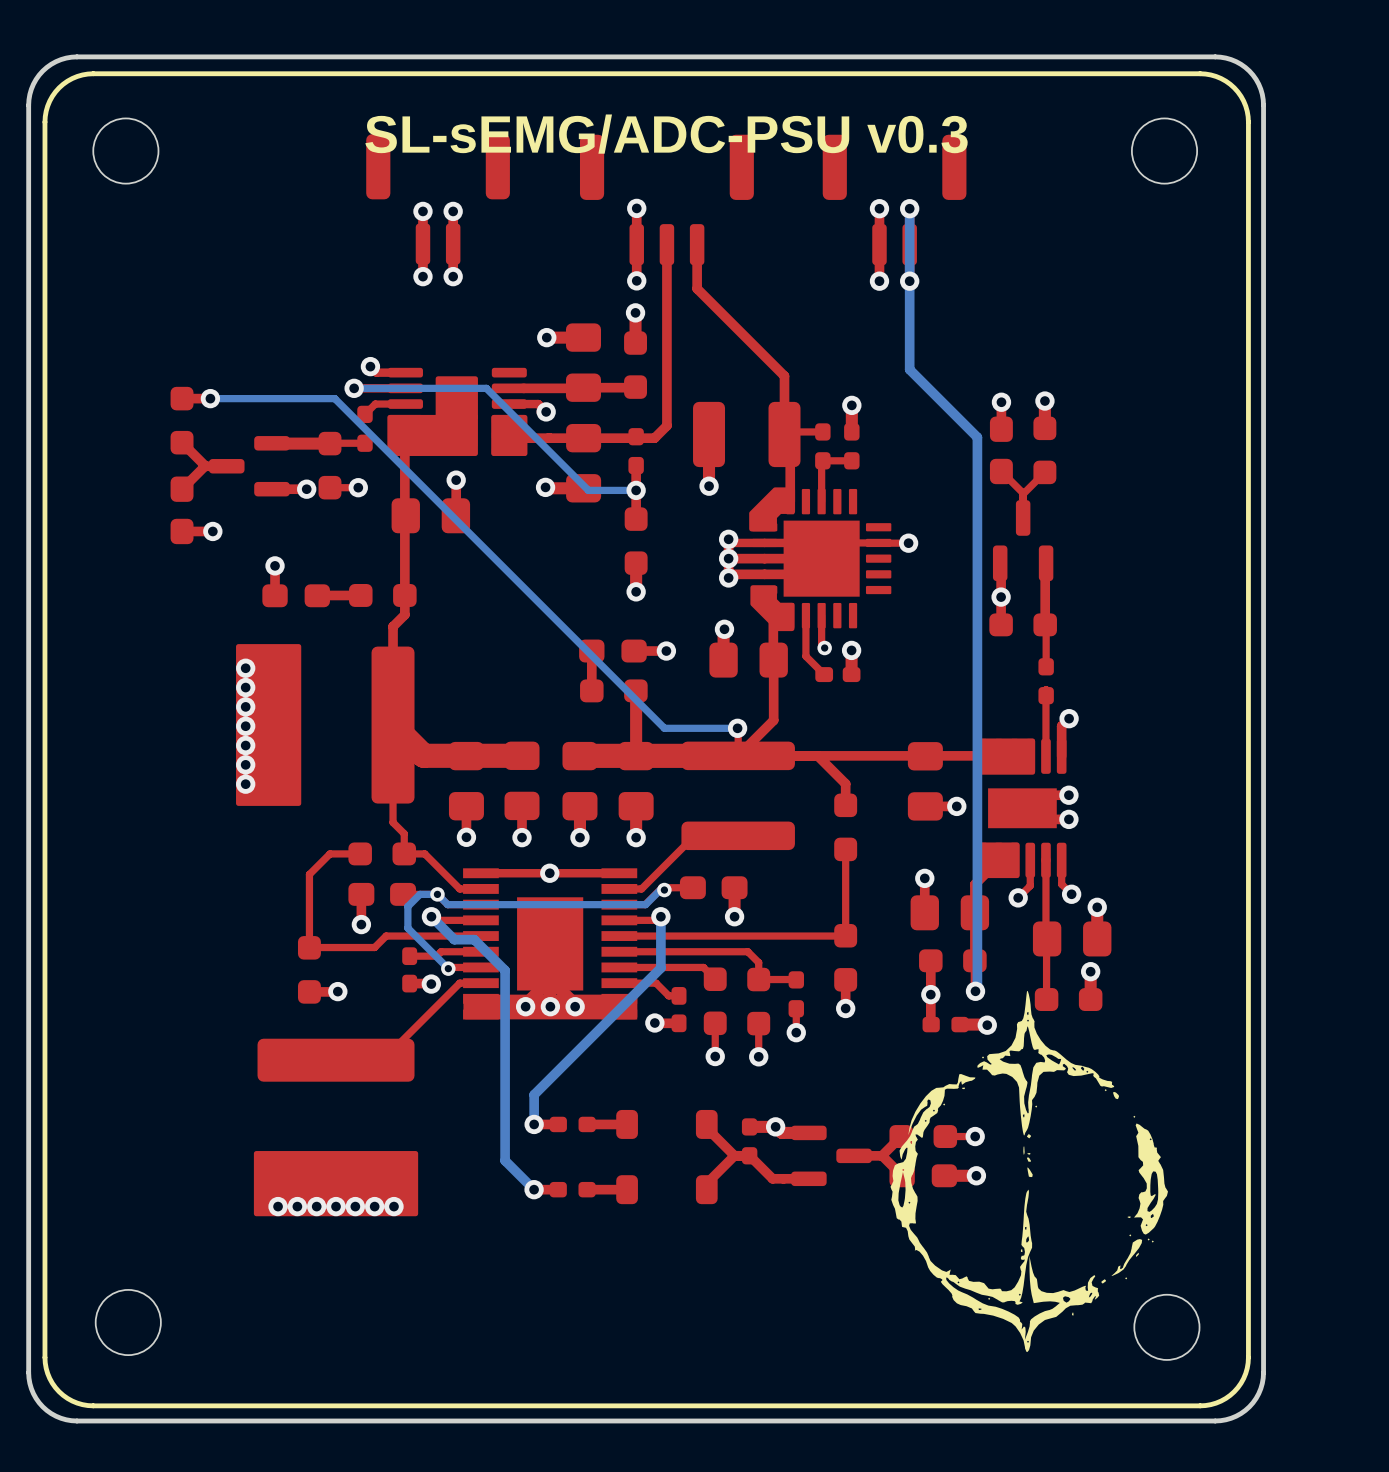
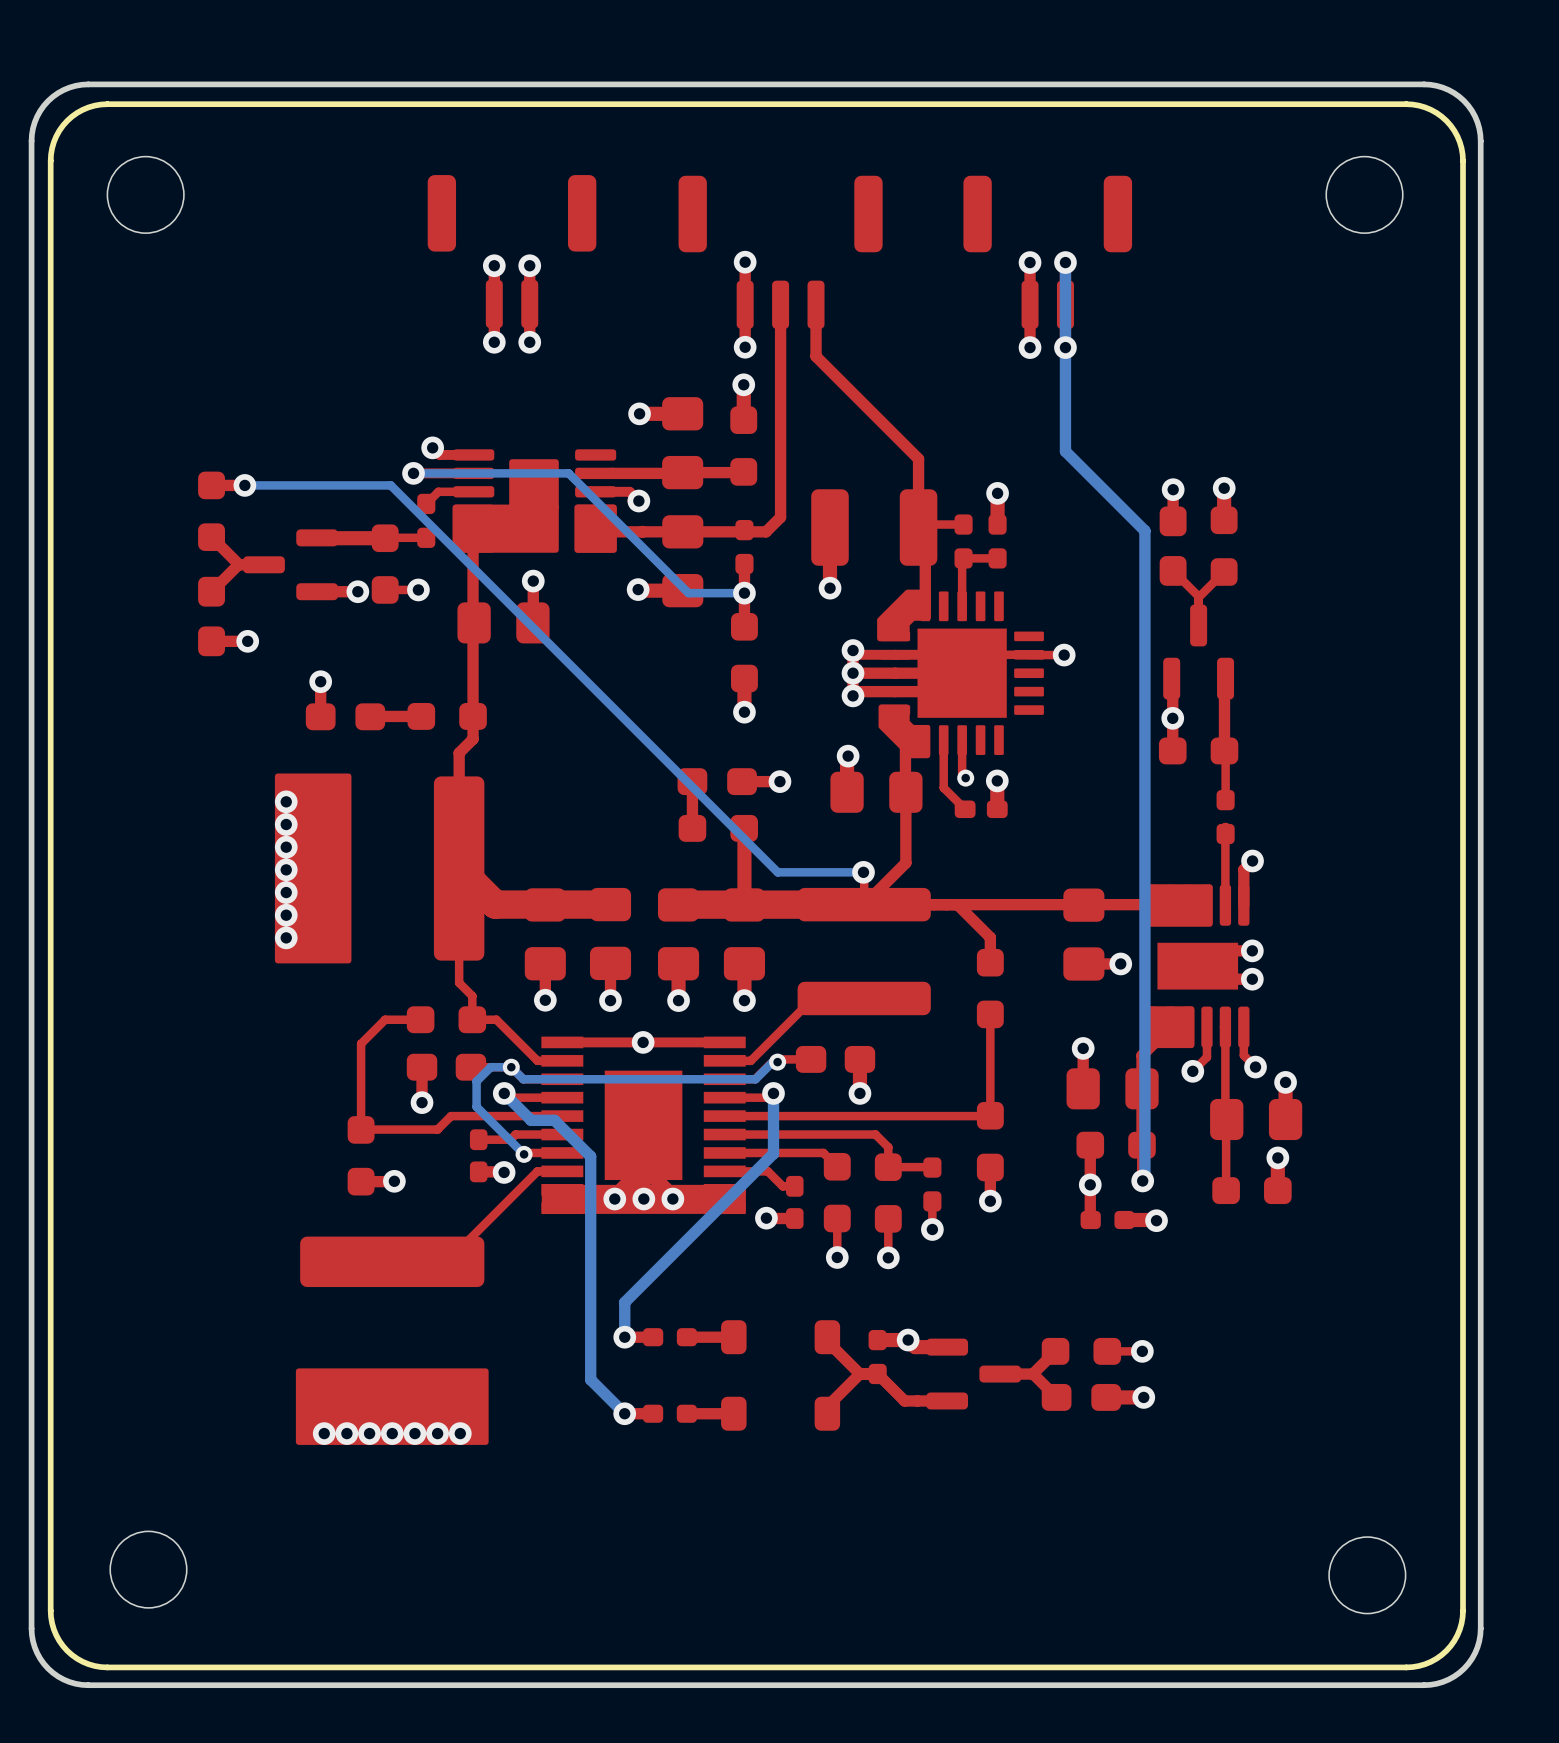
text: SL-sEMG/ADC-PSU v0.3 (666, 134) -> none
drawing: [890, 991, 1168, 1353] -> none

